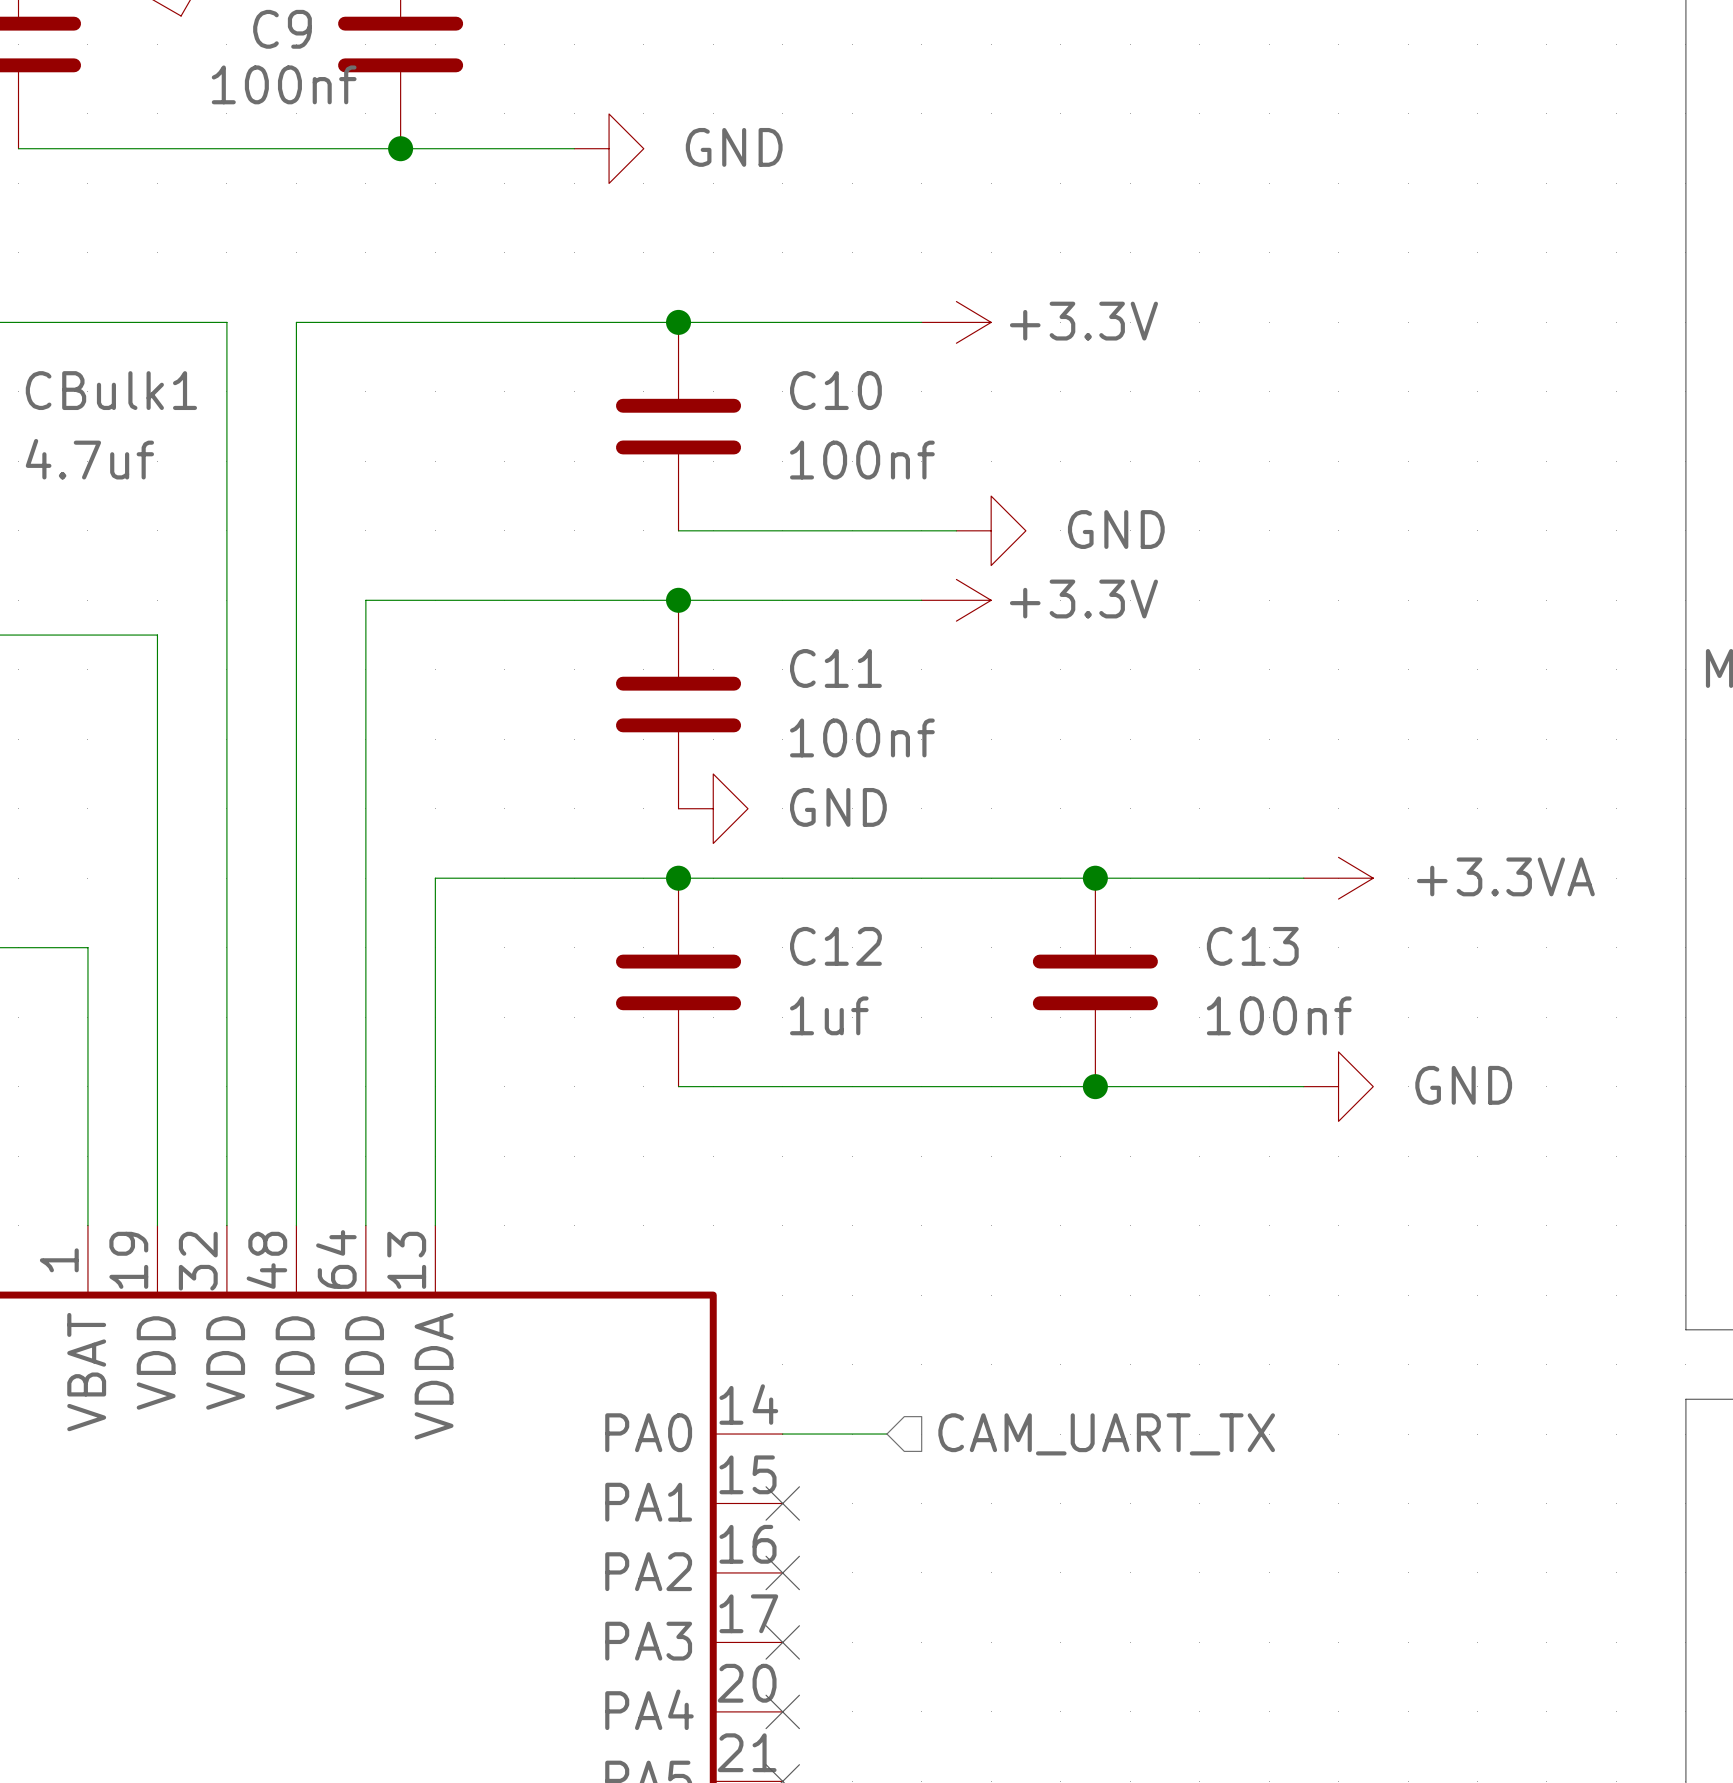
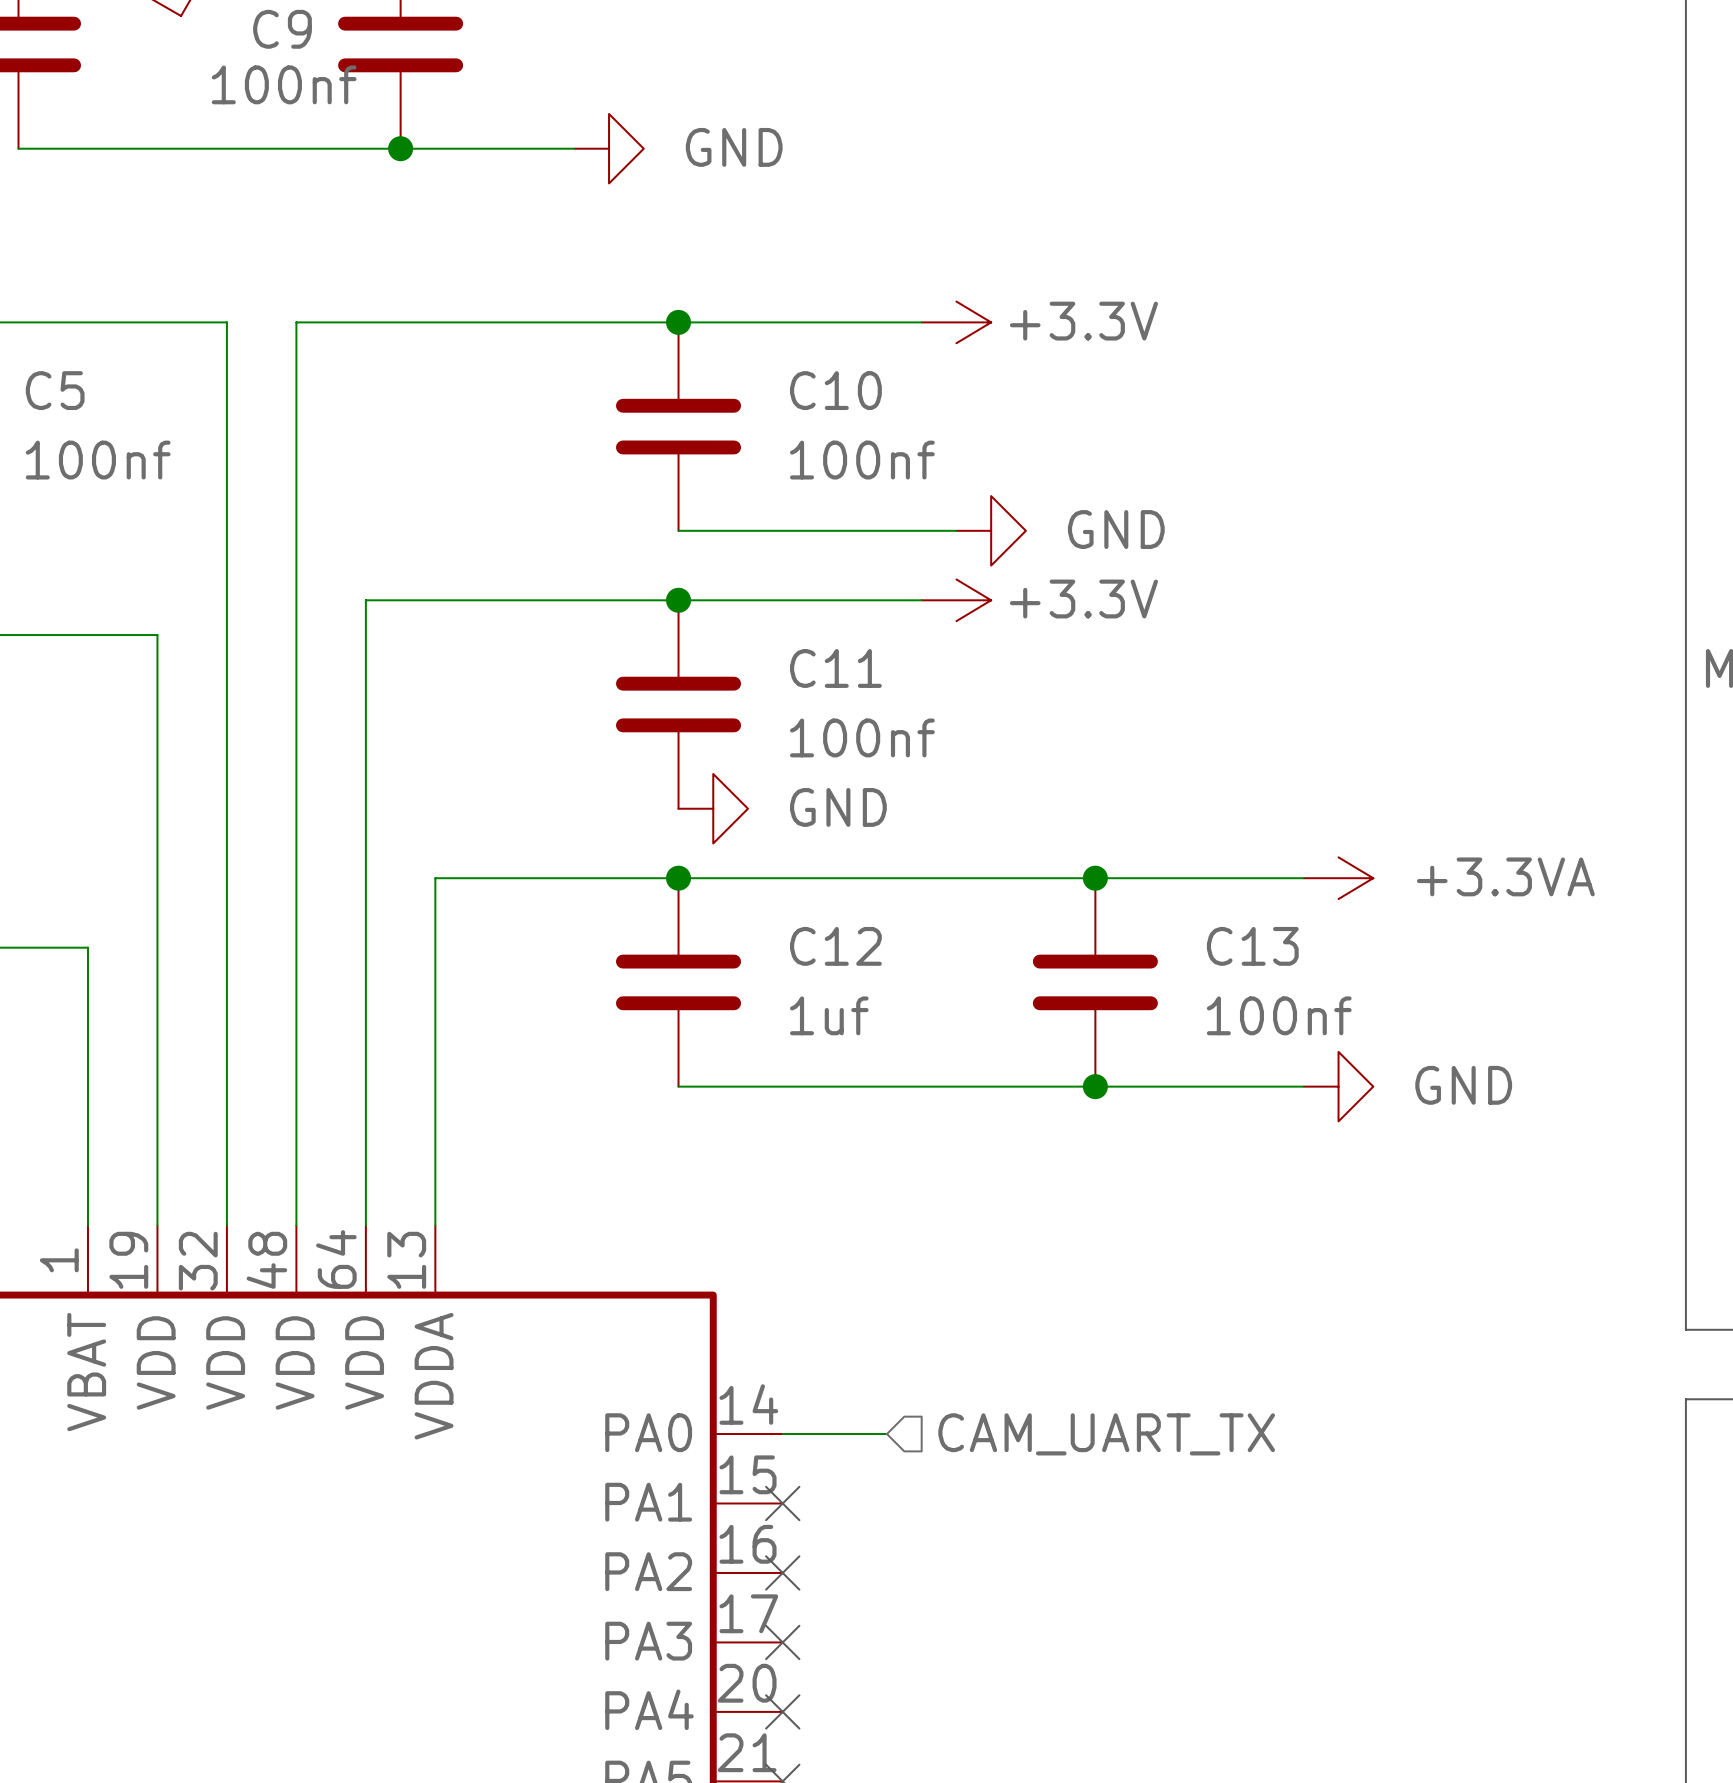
CBulk1 name: CBulk1 (111, 390) -> C5 (55, 390)
CBulk1 value: 4.7uf (89, 459) -> 100nf (98, 460)

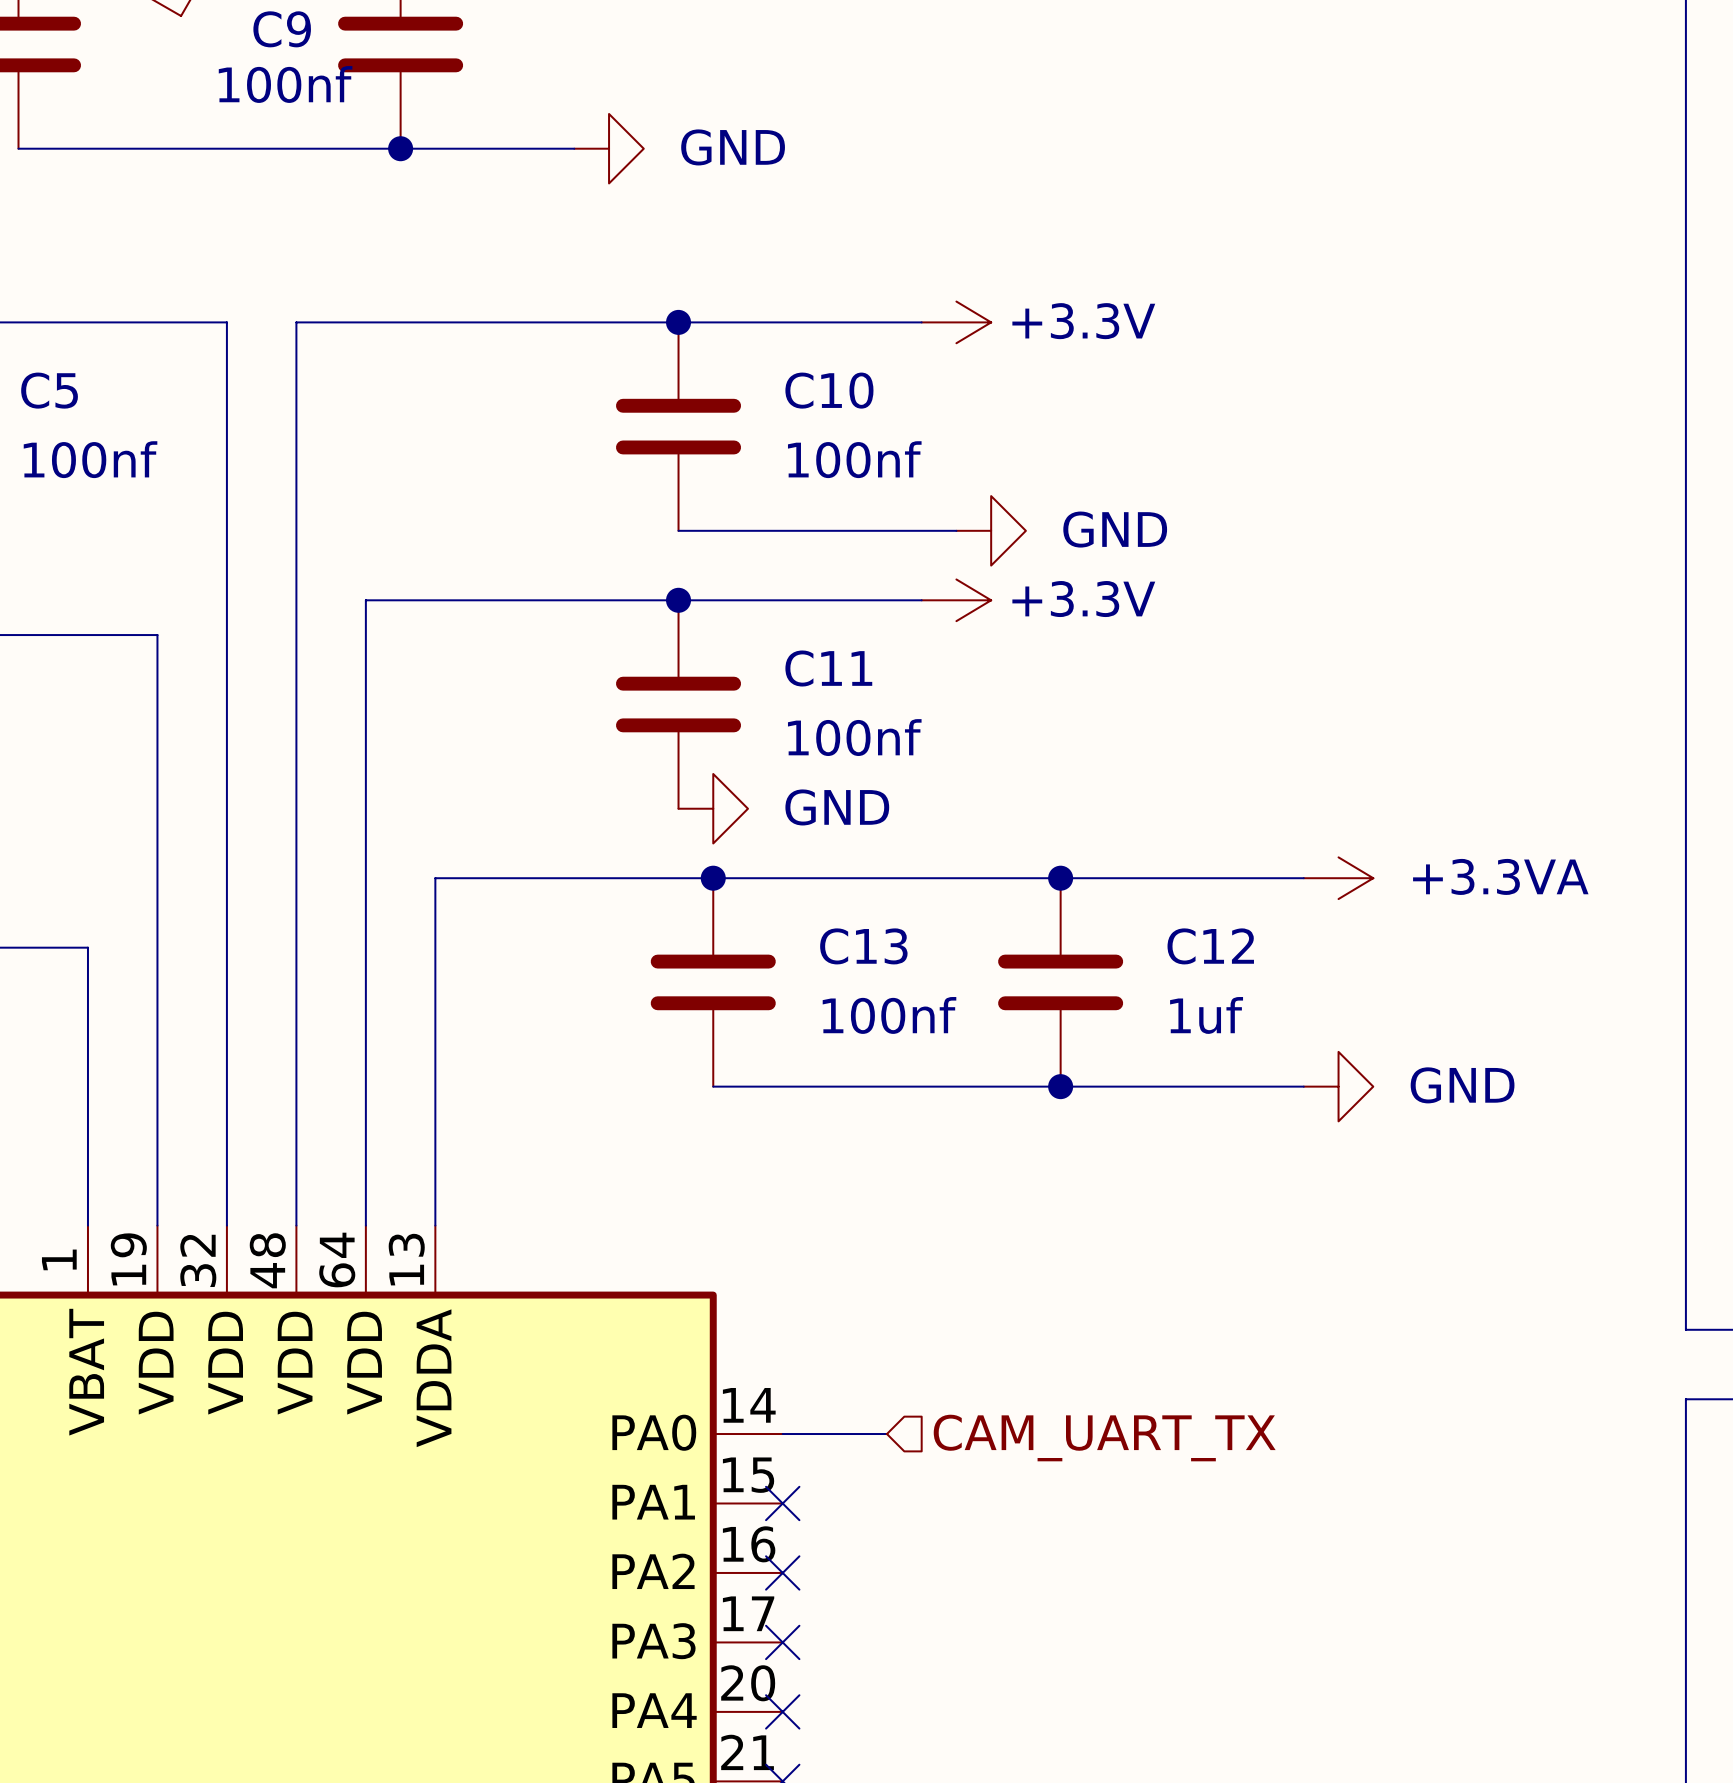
junction position: (678, 878) -> (713, 878)
junction position: (1095, 878) -> (1060, 878)
C12 position: (678, 982) -> (1060, 982)
C13 position: (1095, 982) -> (713, 982)
wire: (678, 1086) (713, 1086) -> none
junction position: (1095, 1086) -> (1060, 1086)

